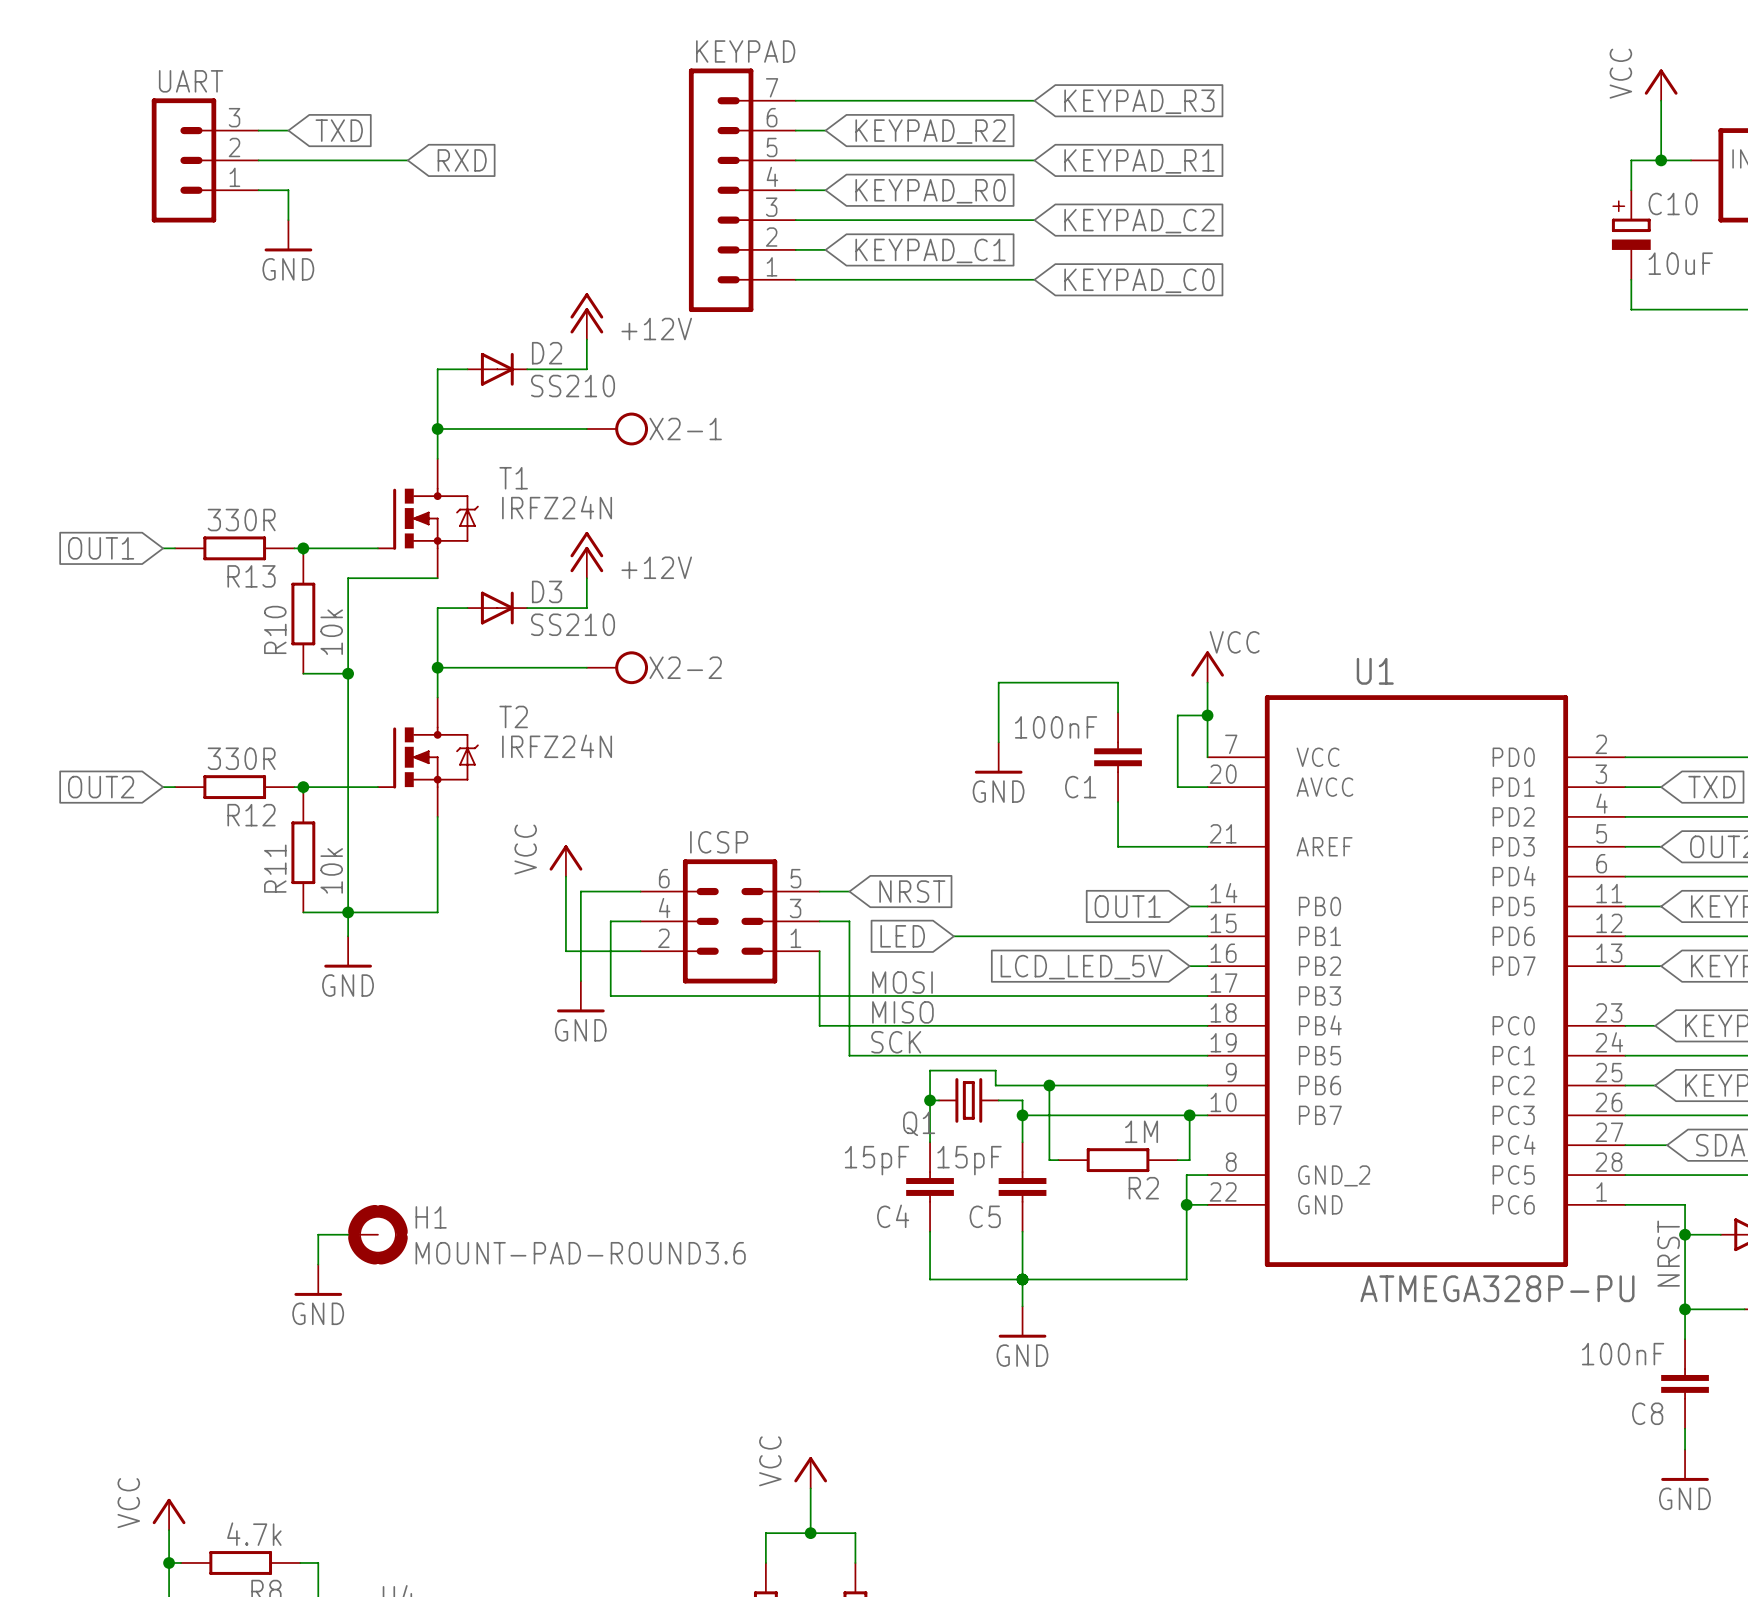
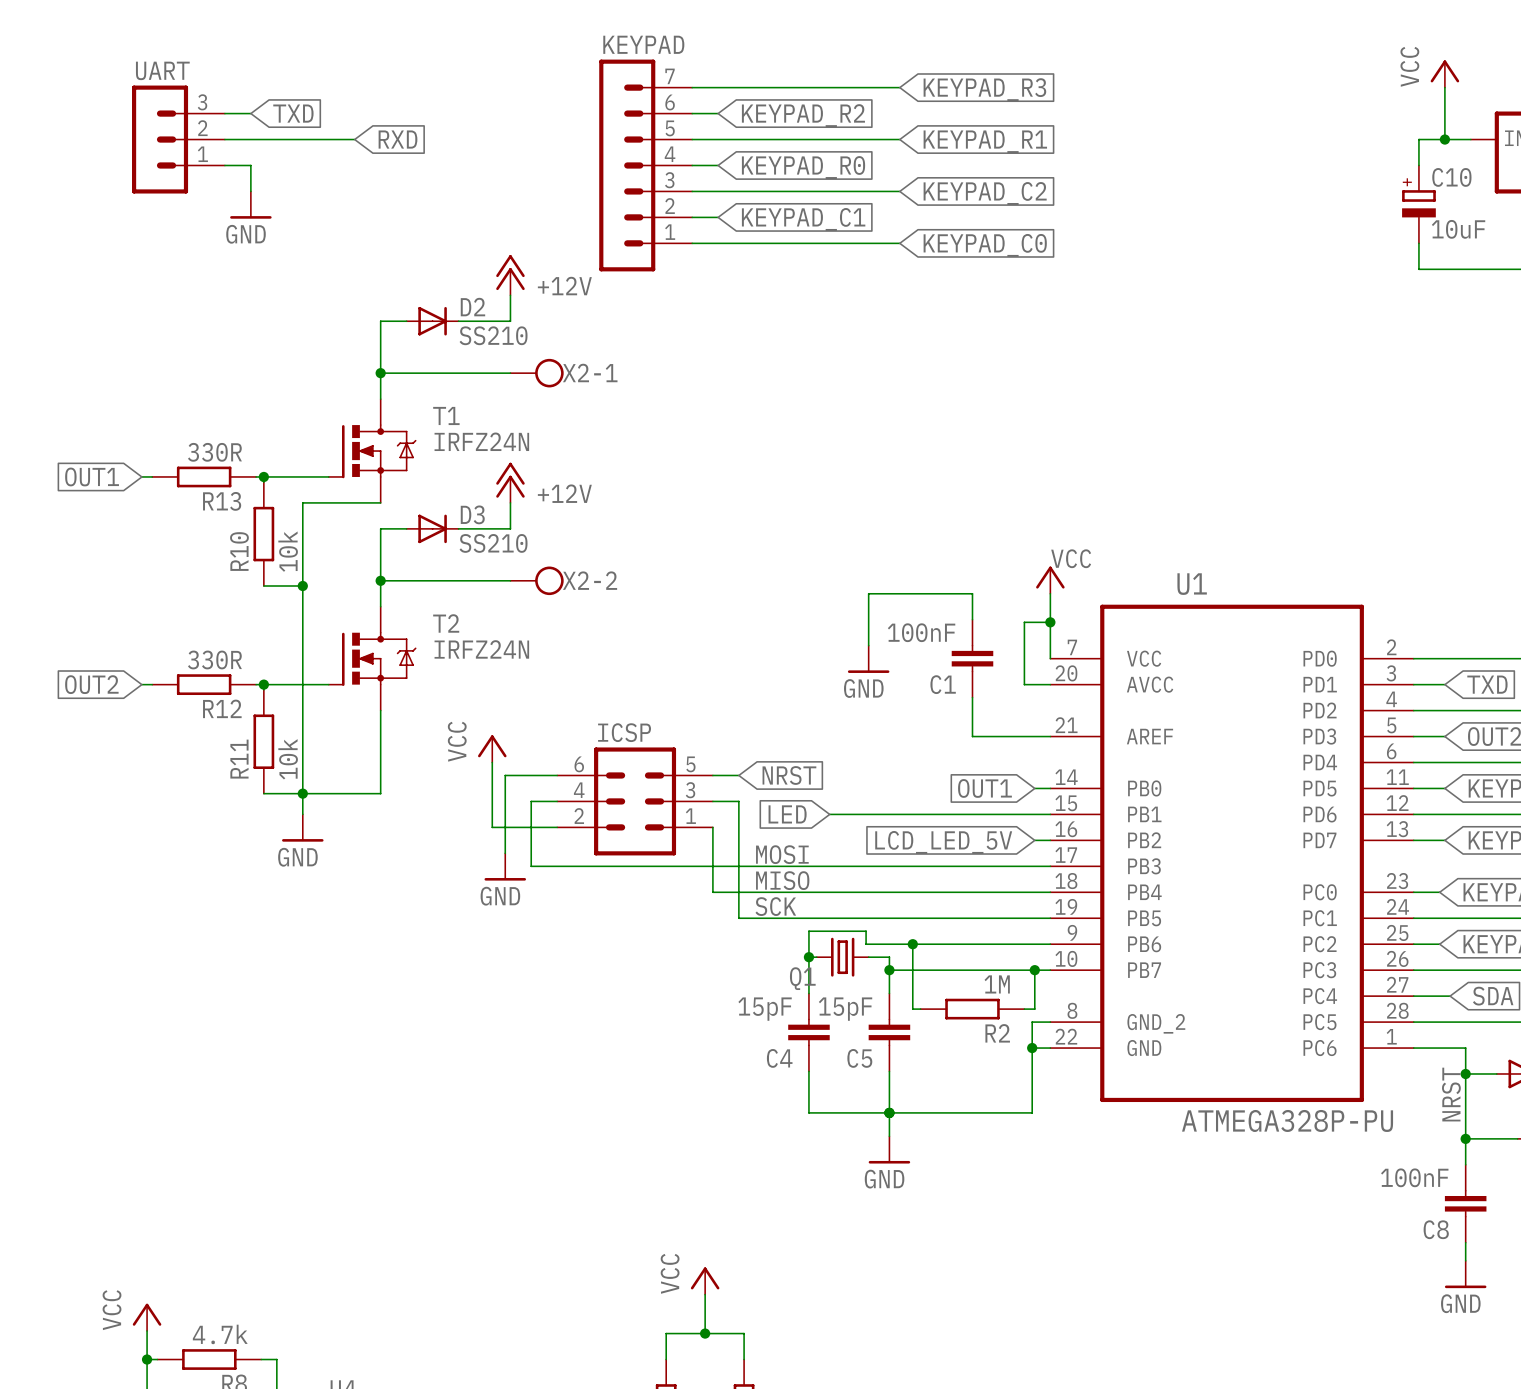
wire: (348, 1234) (318, 1234) (318, 1264) -> none
H1: MOUNT-PAD-ROUND3.6 (377, 1234) -> none
power symbol: GND (318, 1280) -> none

